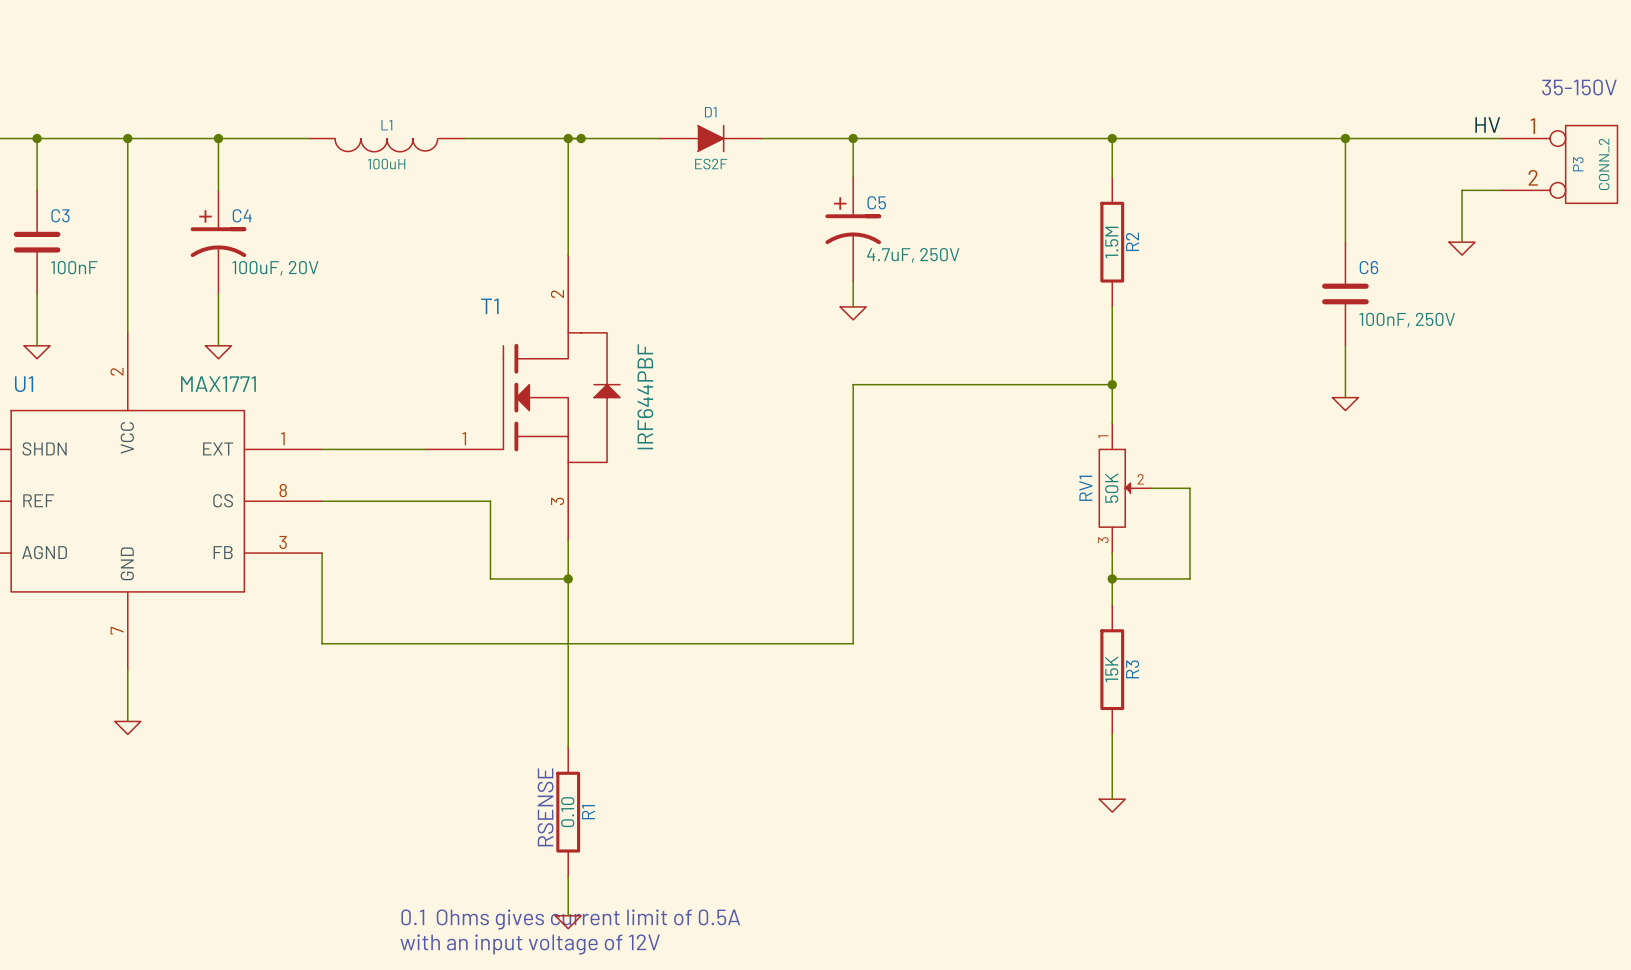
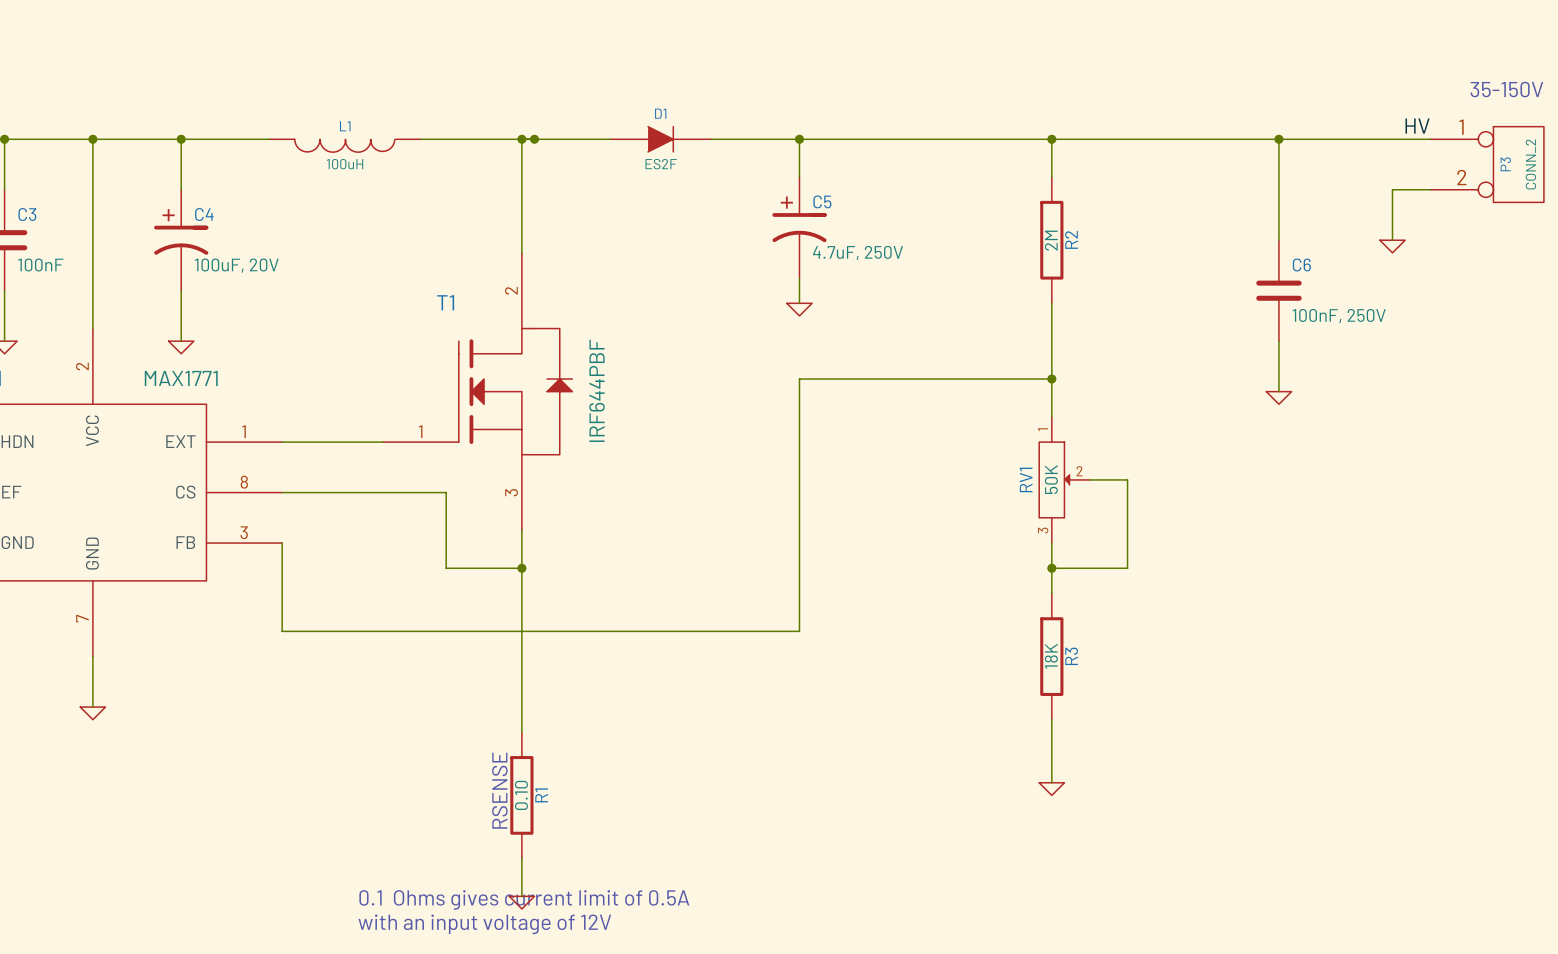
R2 value: 1.5M (1111, 242) -> 2M (1051, 240)
R3 value: 15K (1111, 669) -> 18K (1051, 656)

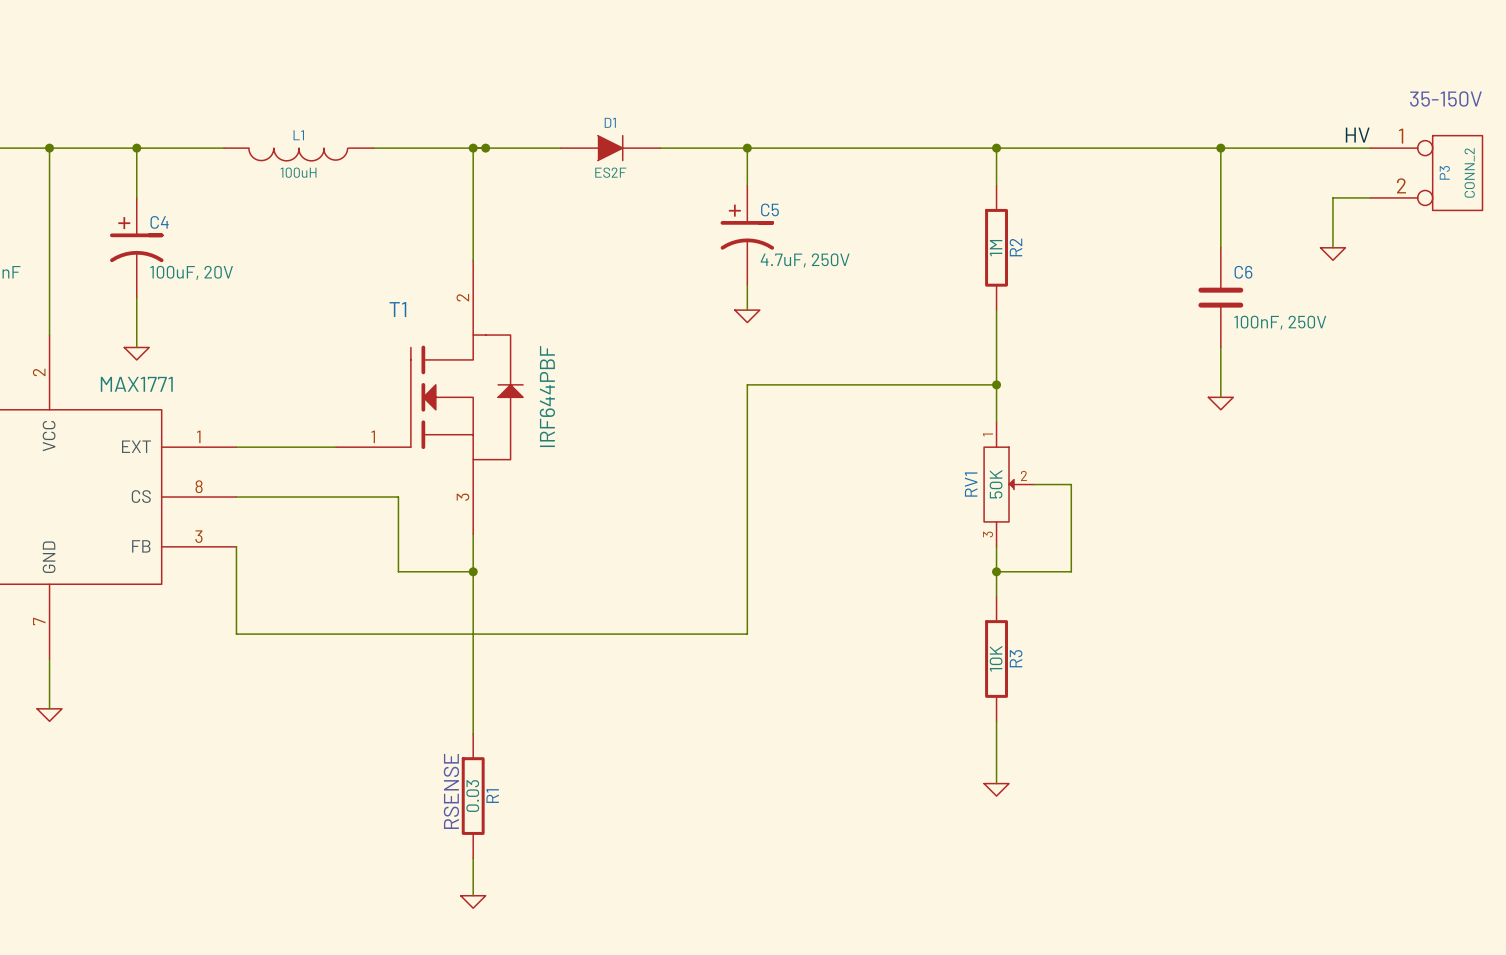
R2 value: 2M (1051, 240) -> 1M (996, 248)
R3 value: 18K (1051, 656) -> 10K (996, 658)
R1 value: 0.10 (521, 795) -> 0.03 (472, 796)
text: 0.1 Ohms gives current limit of 0.5A (524, 899) -> none
text: with an input voltage of 12V (484, 924) -> none

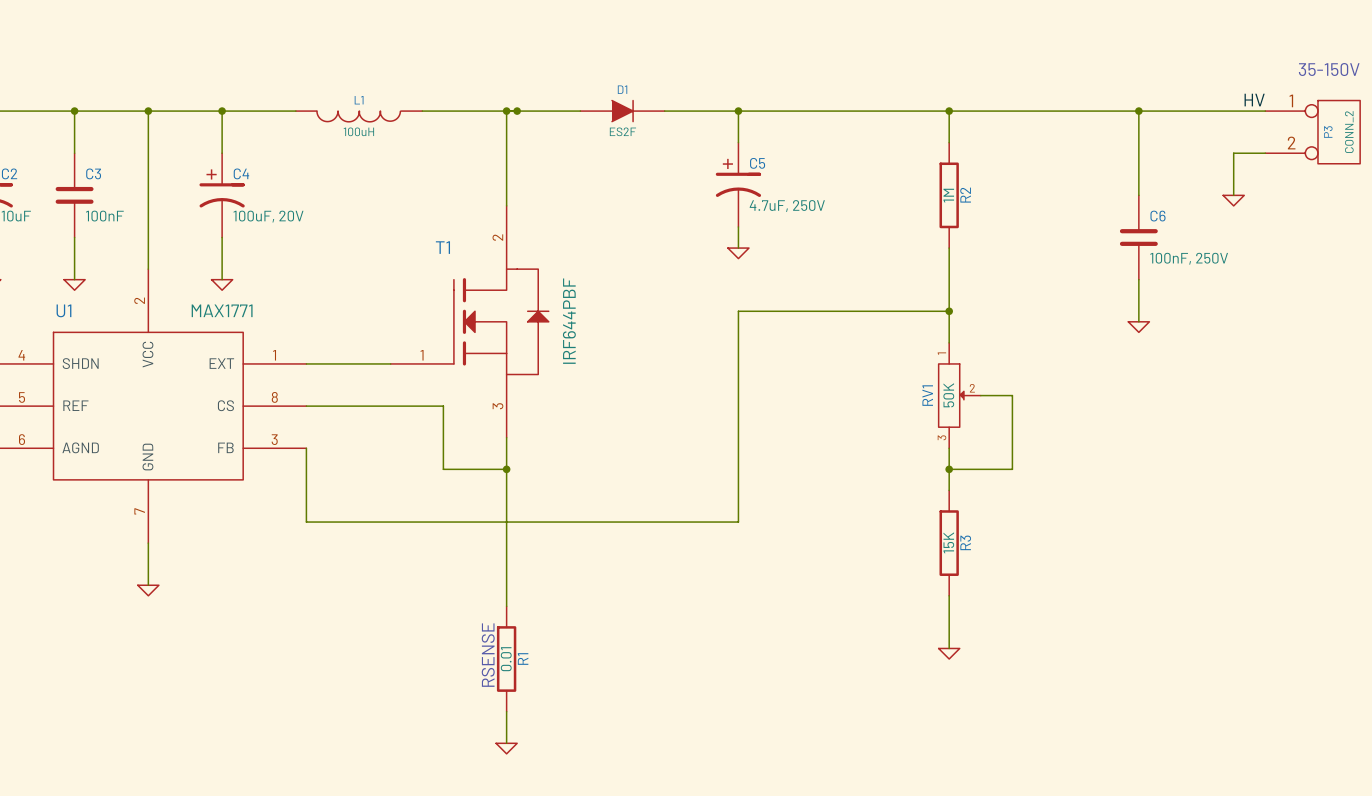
R3 value: 10K (996, 658) -> 15K (948, 542)
R1 value: 0.03 (472, 796) -> 0.01 (506, 659)

